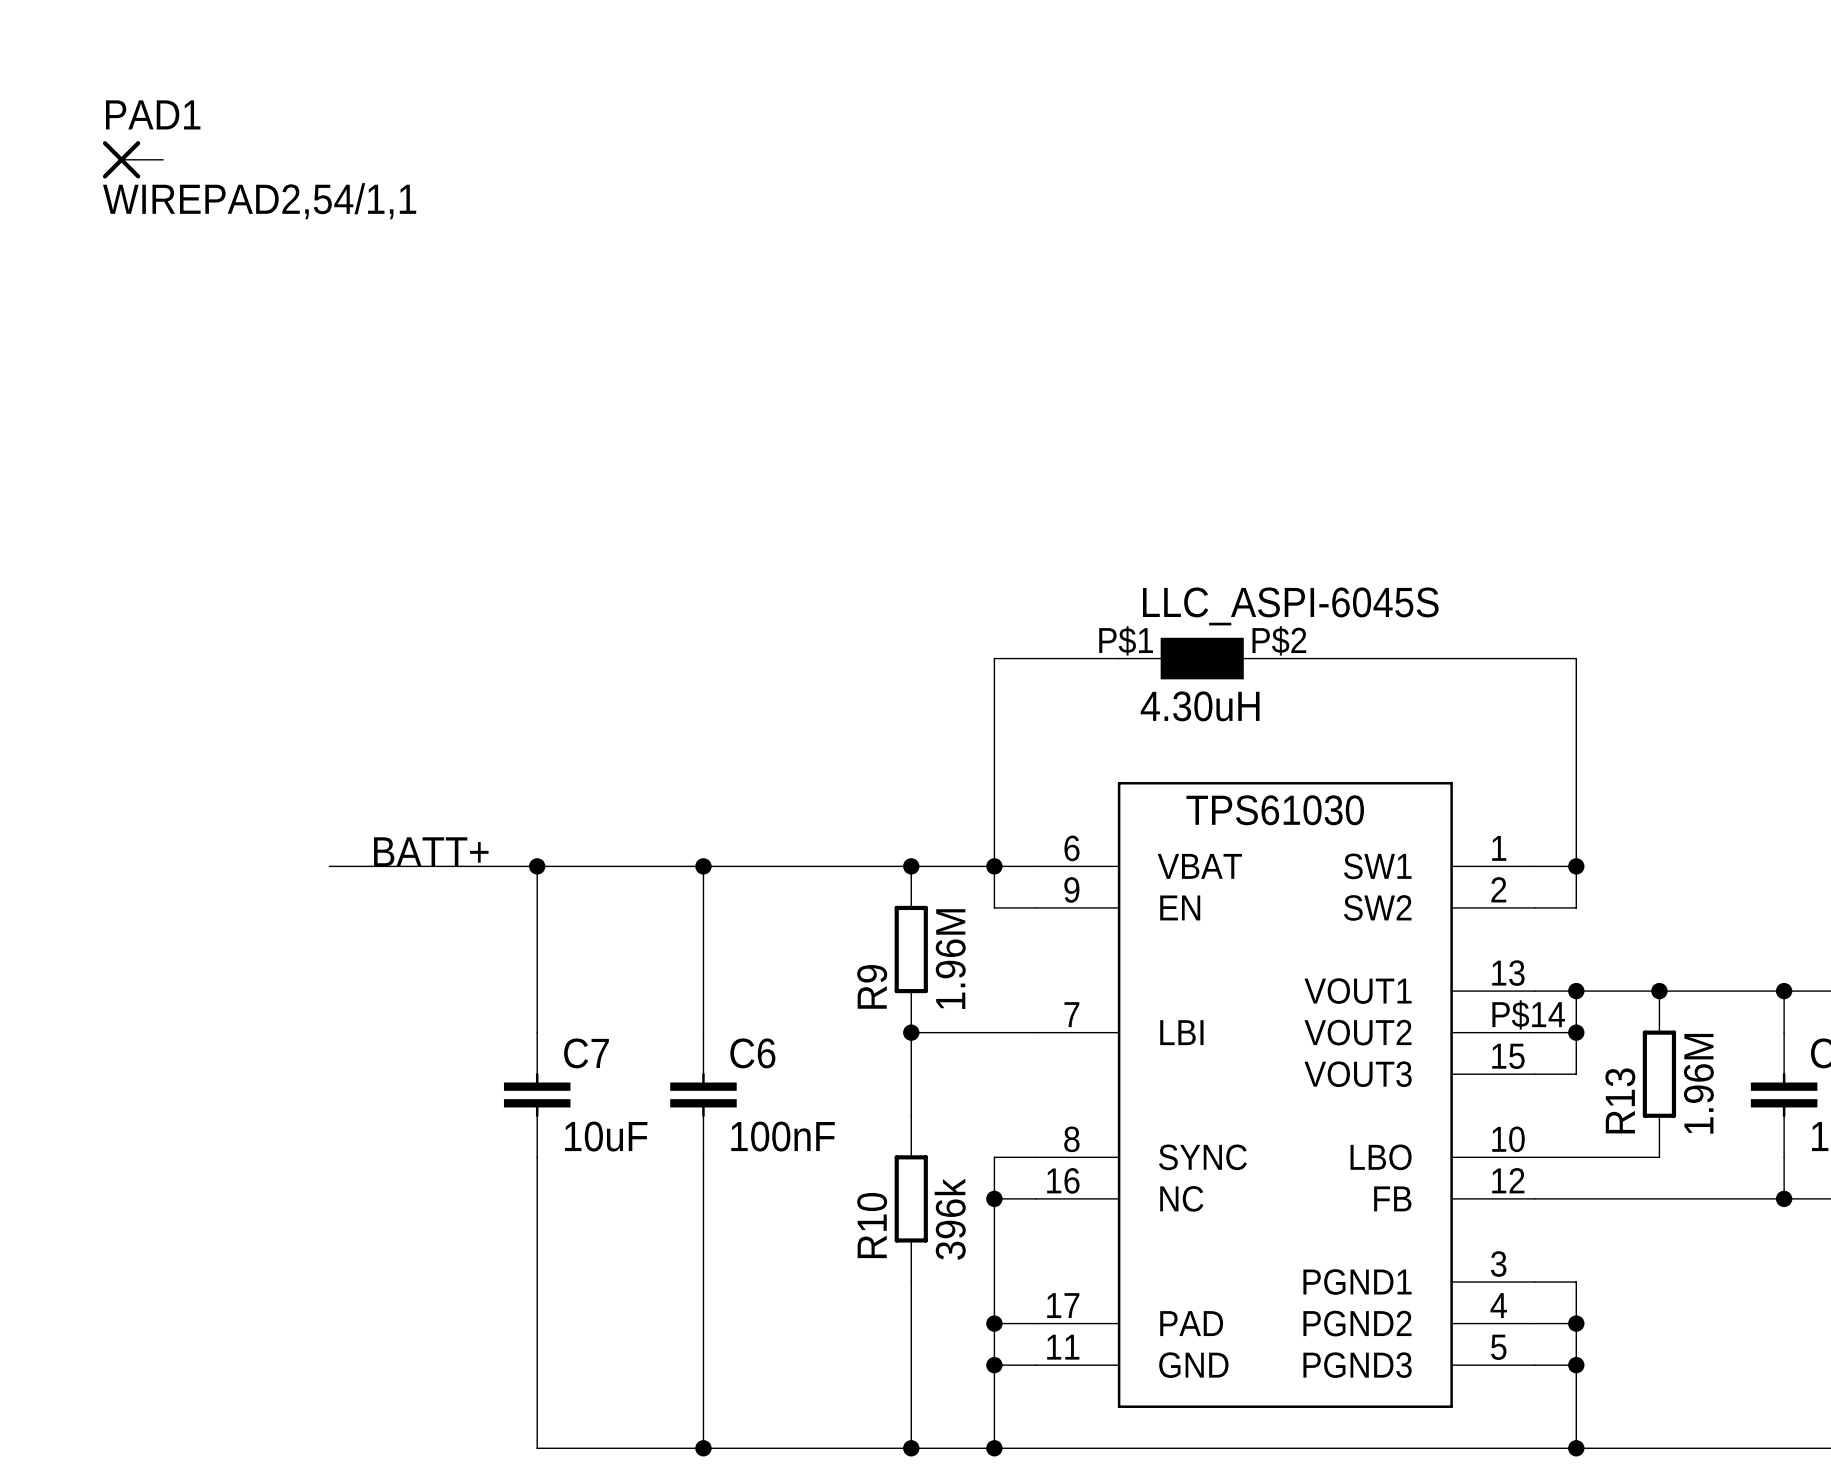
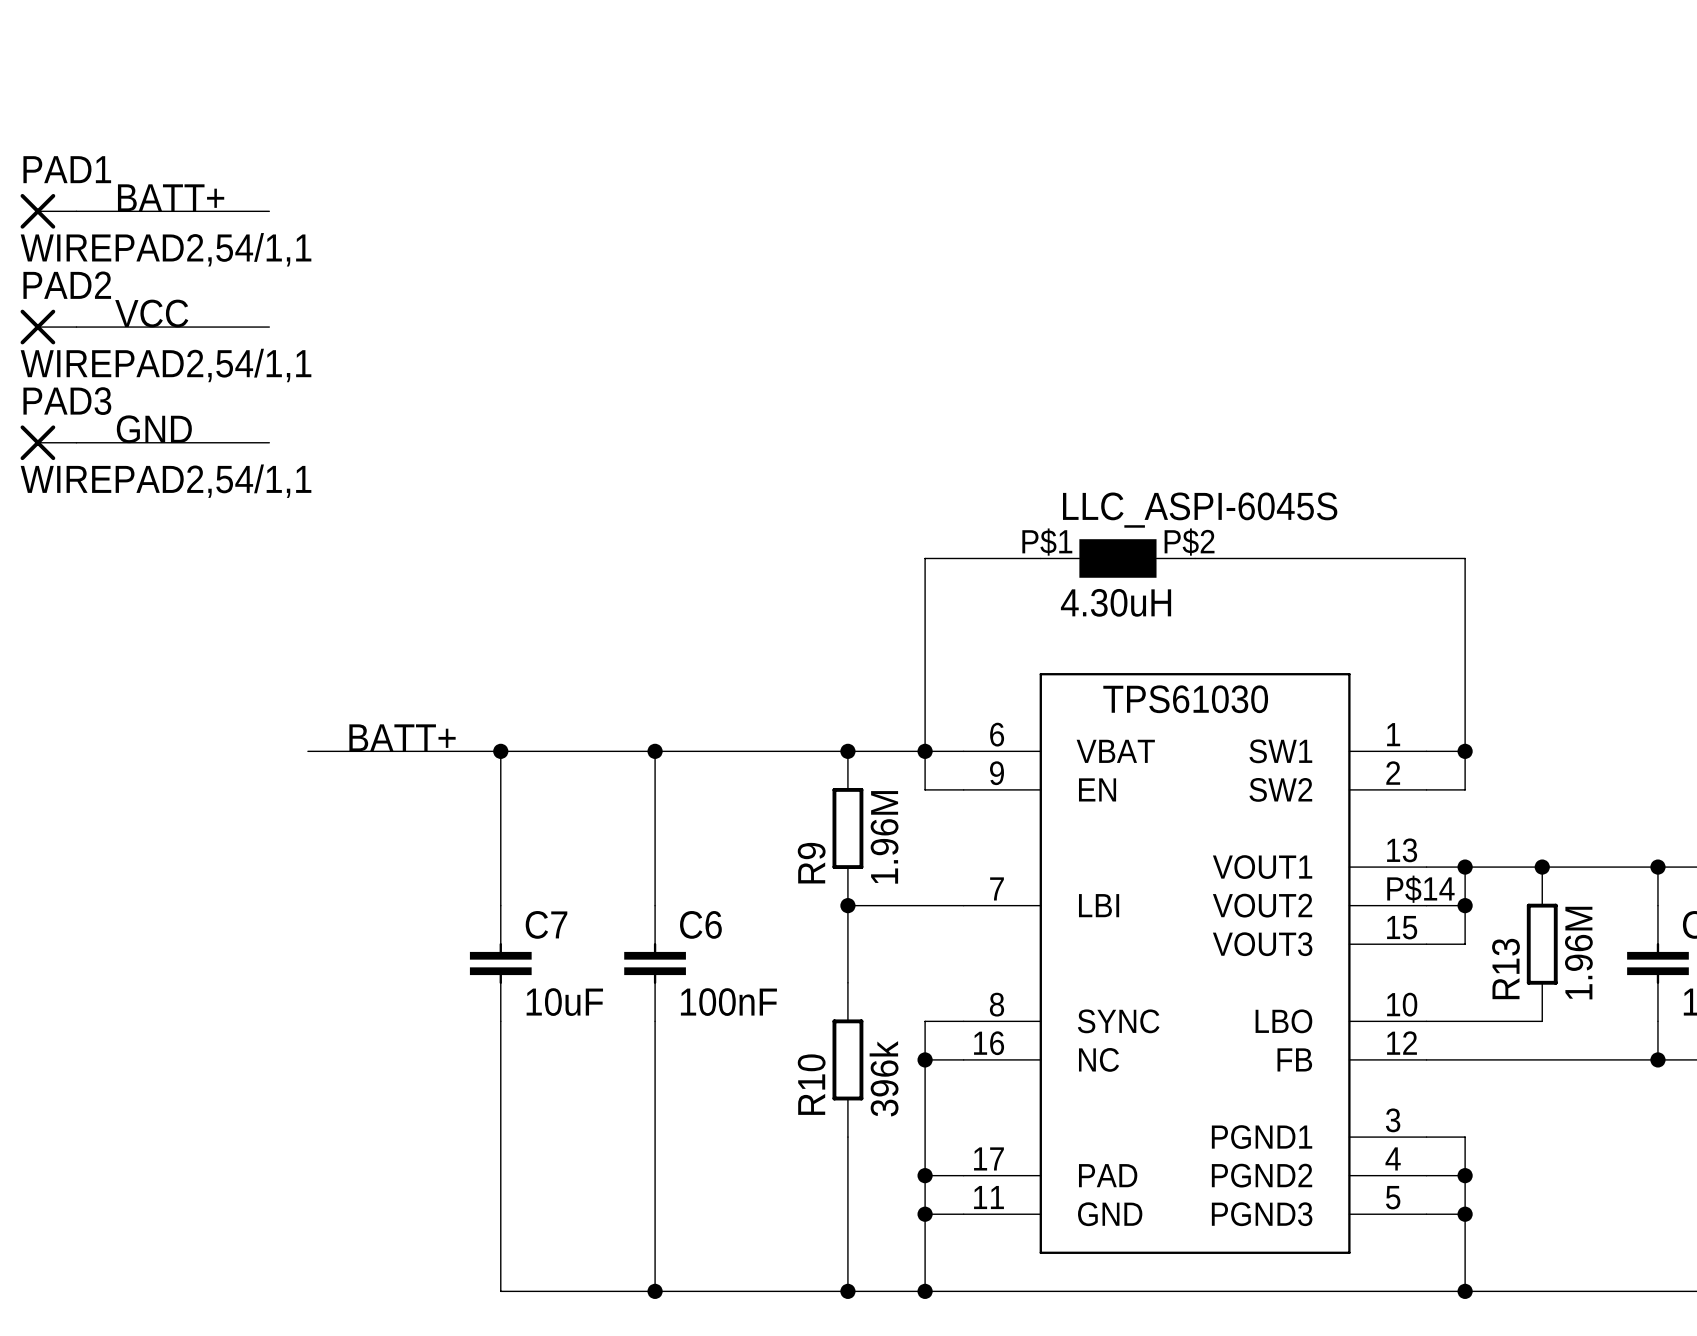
PAD1 position: (132, 159) -> (48, 211)
label: none -> BATT+ (171, 197)
wire: none -> (76, 211) (269, 211)
label: none -> VCC (151, 313)
PAD2: none -> WIREPAD2,54/1,1 (48, 327)
wire: none -> (76, 327) (269, 327)
label: none -> GND (154, 429)
PAD3: none -> WIREPAD2,54/1,1 (48, 442)
wire: none -> (76, 442) (269, 442)

